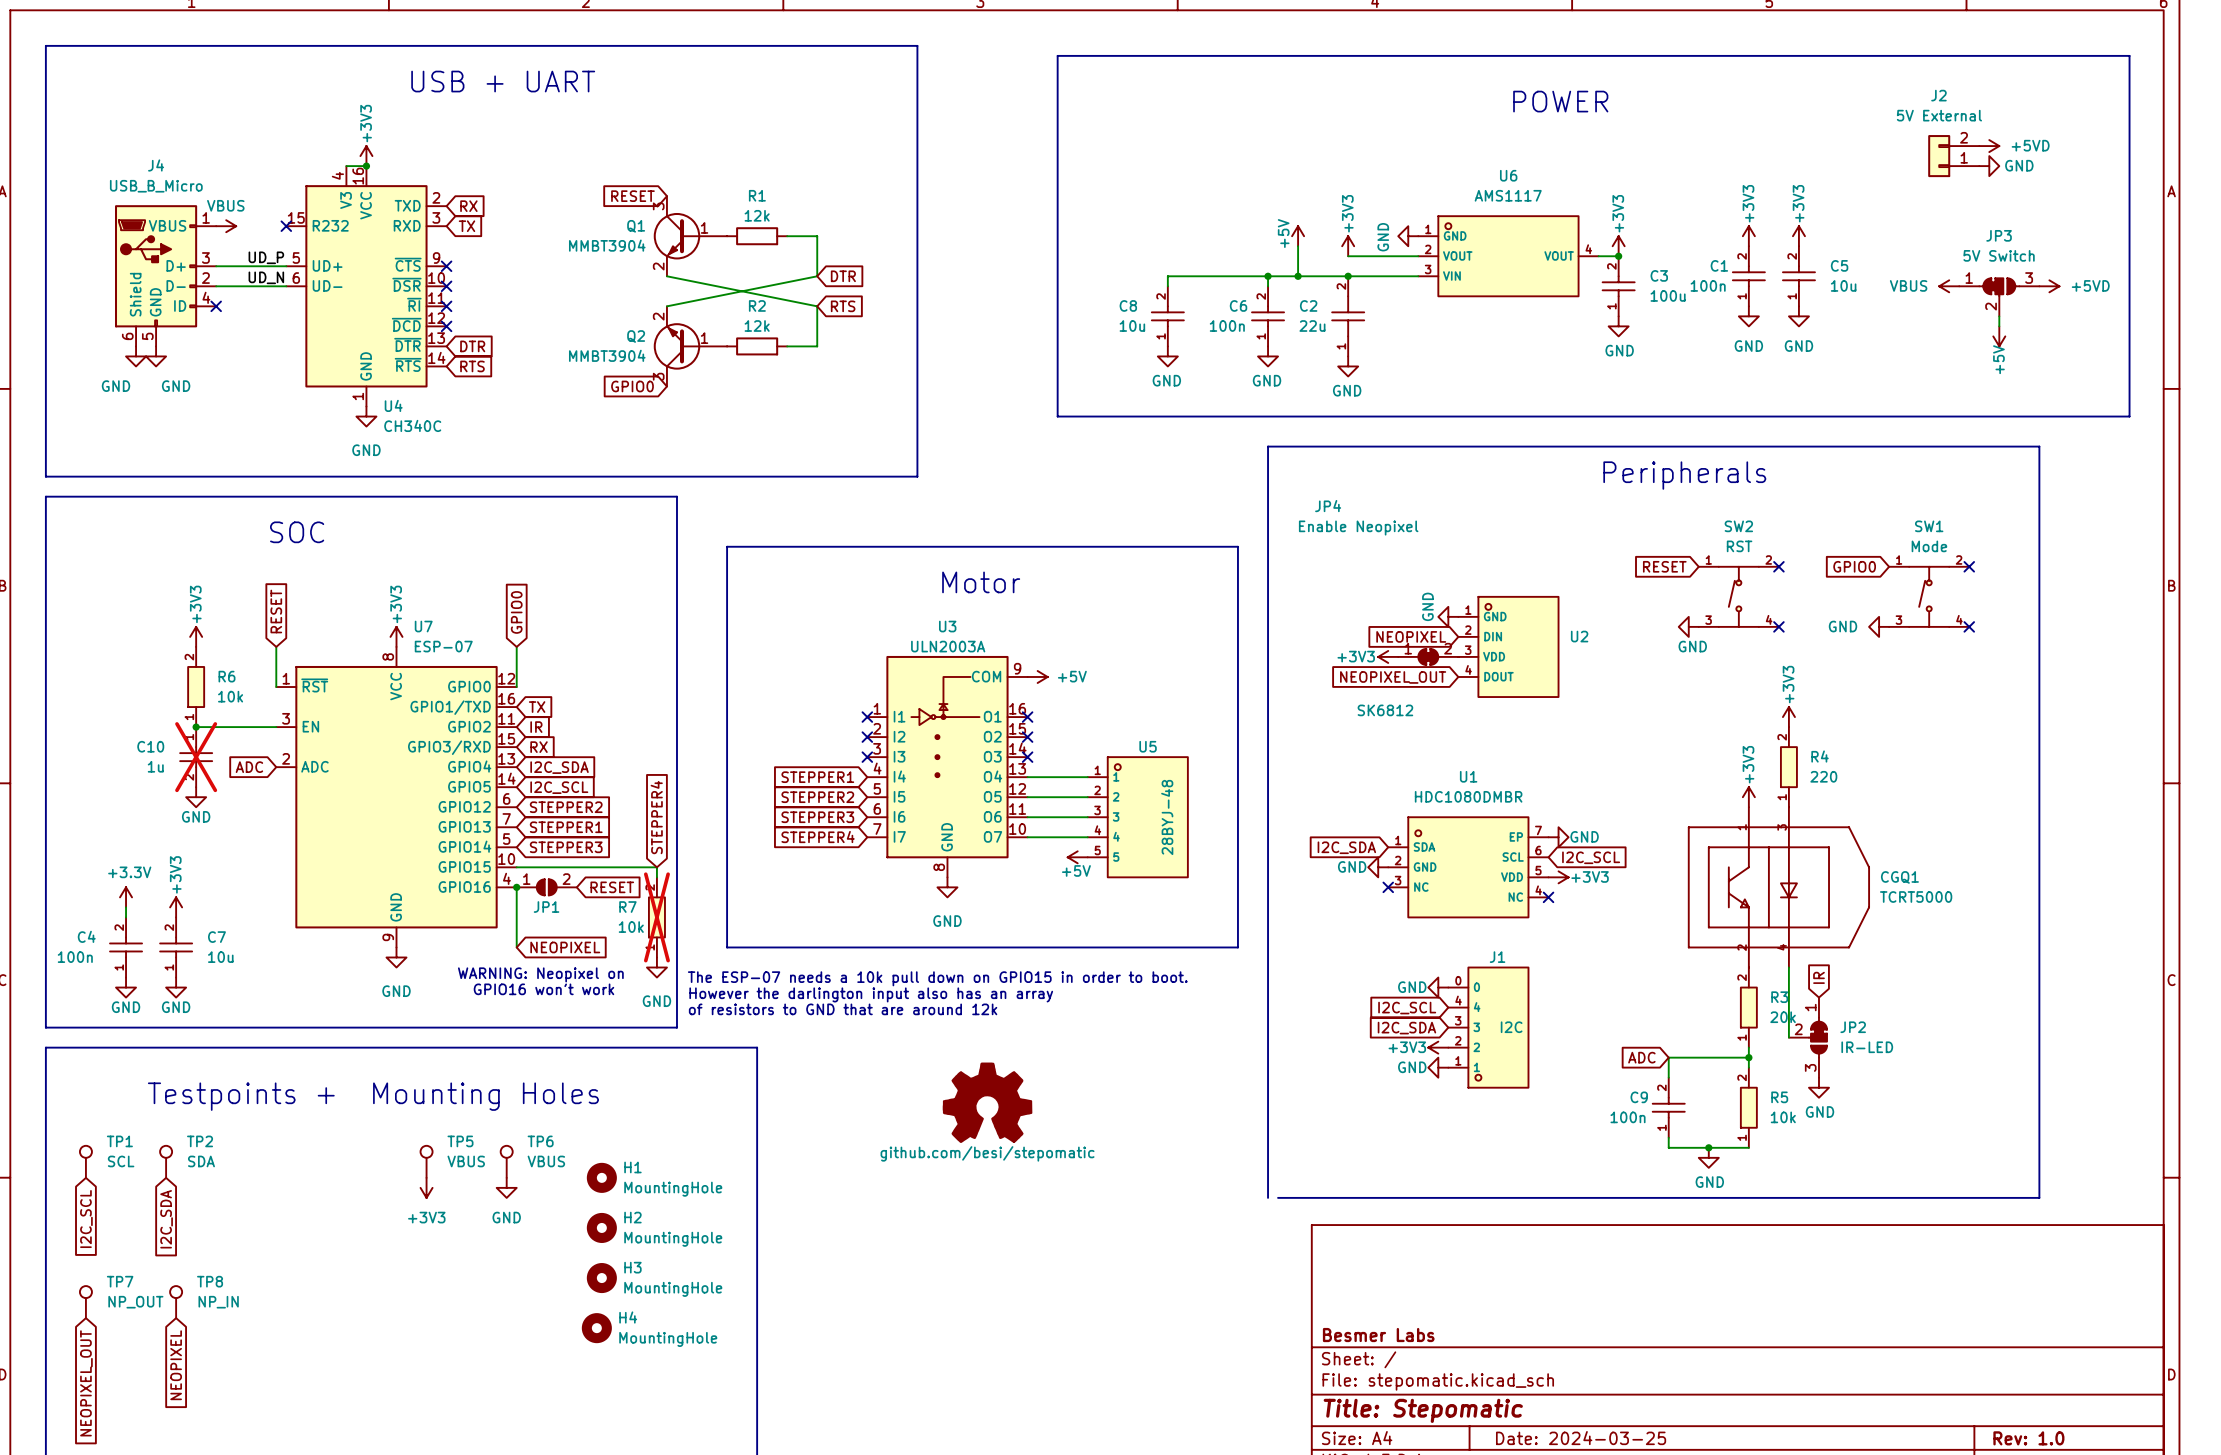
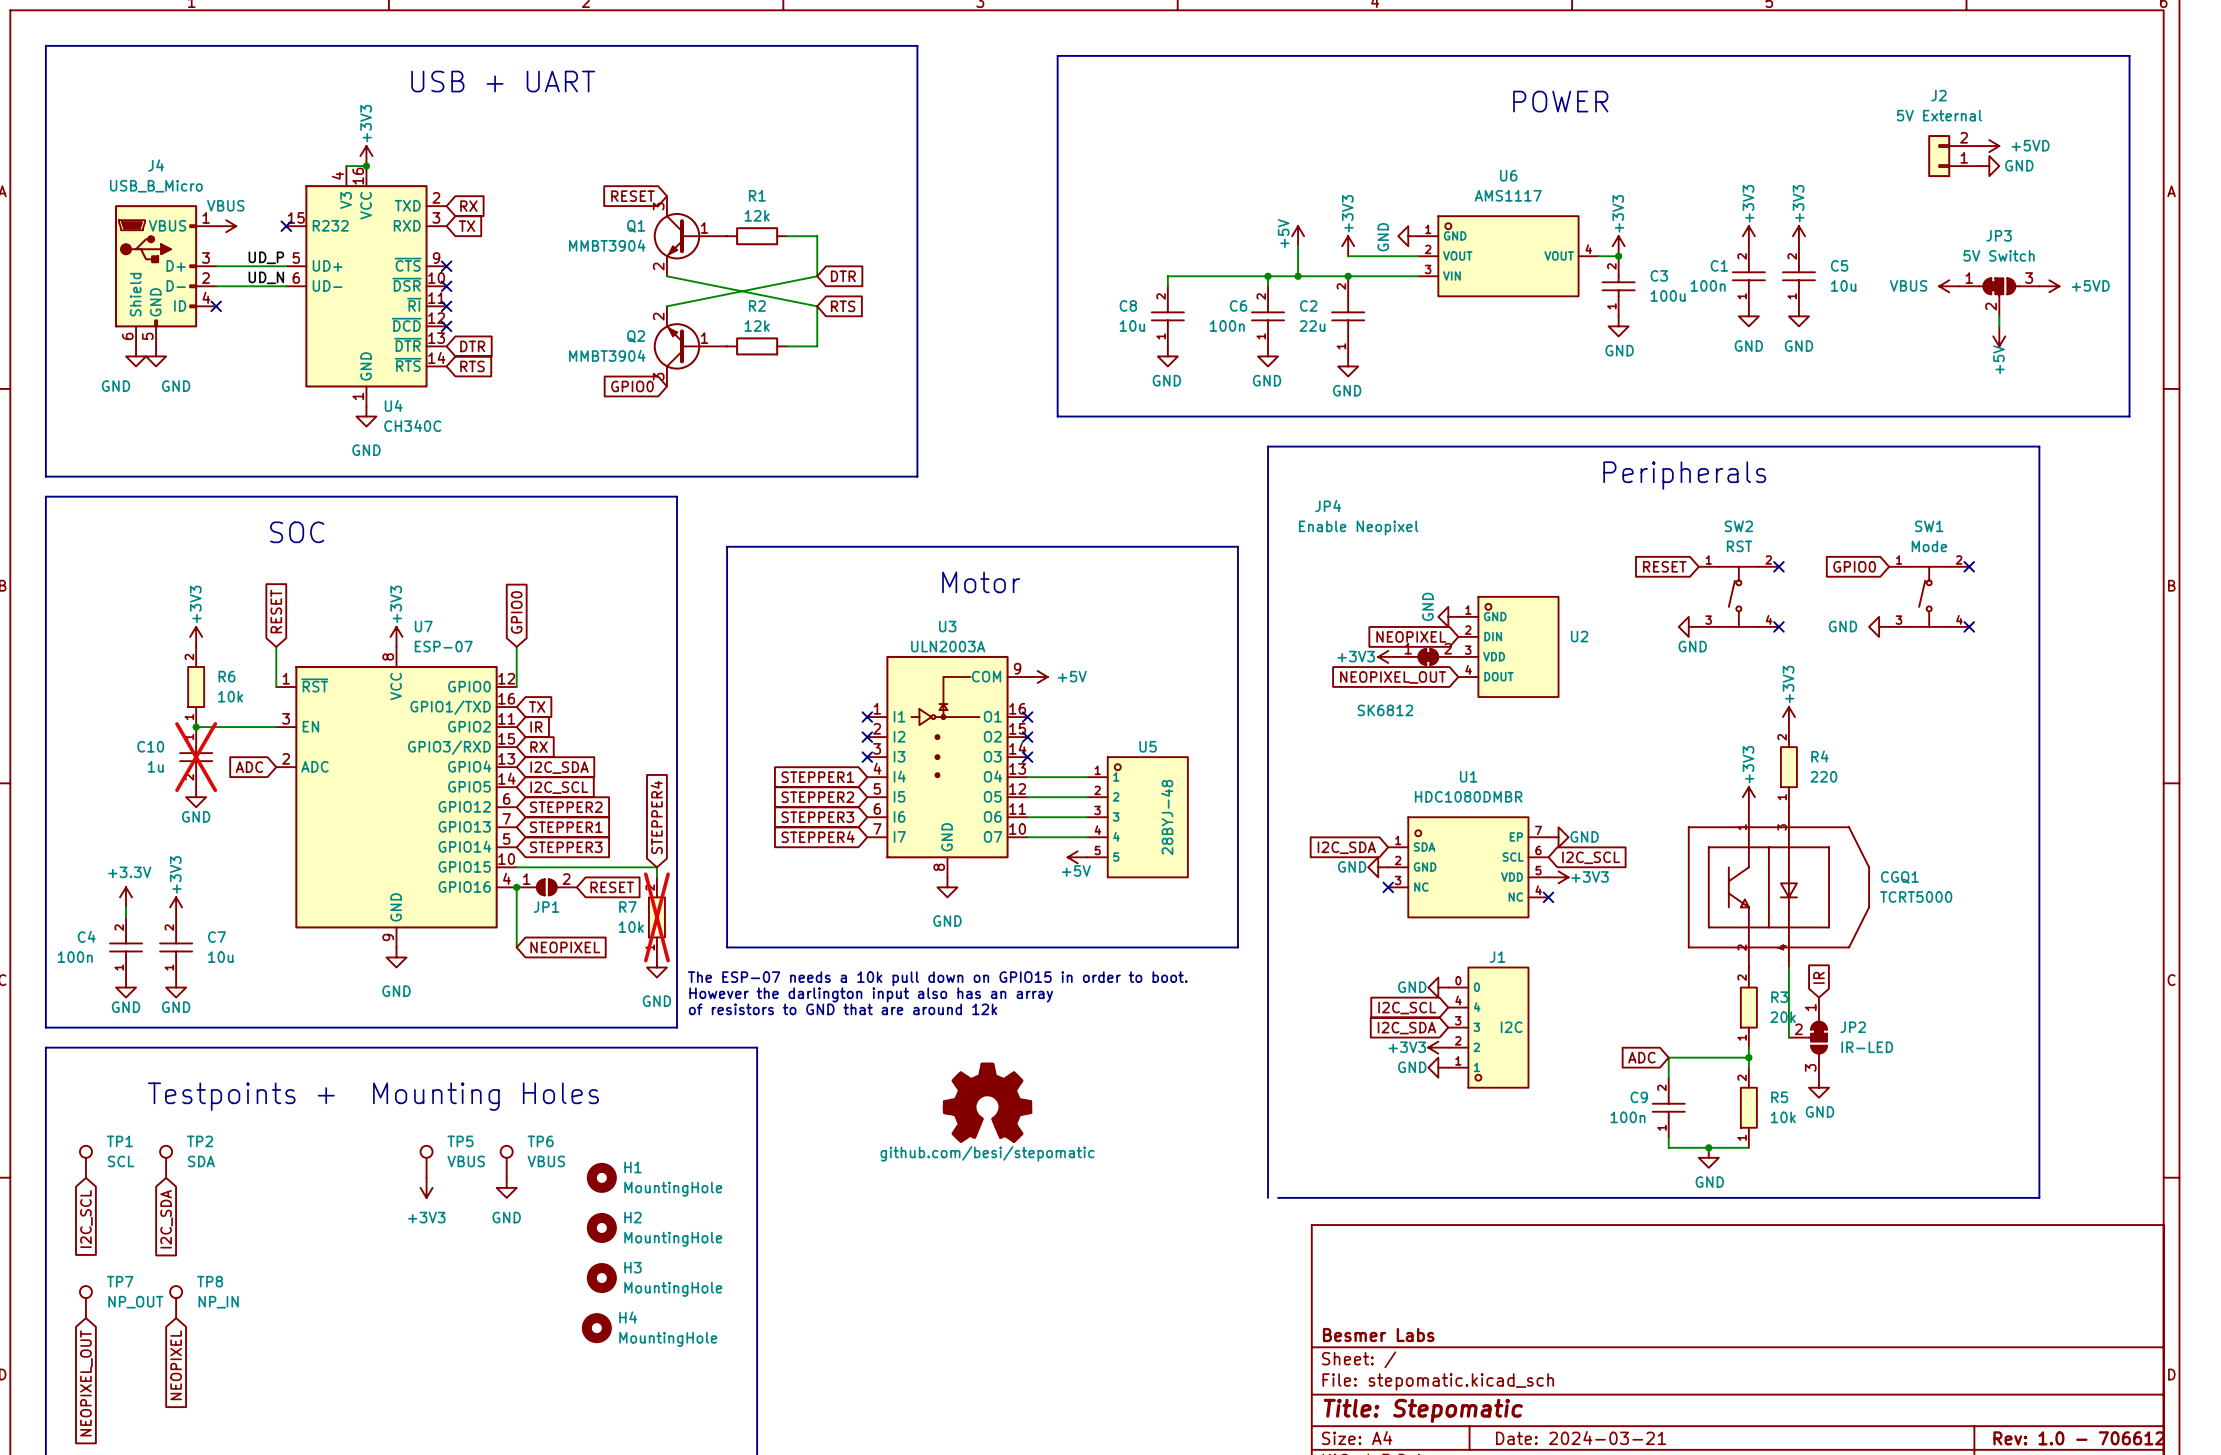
text: WARNING: Neopixel on (540, 974) -> none
text: GPIO16 won't work (543, 989) -> none
title block: Date: 2024-03-25 (1581, 1438) -> Date: 2024-03-21 (1581, 1438)
title block: Rev: 1.0 (2028, 1438) -> Rev: 1.0 - 706612 (2079, 1438)

